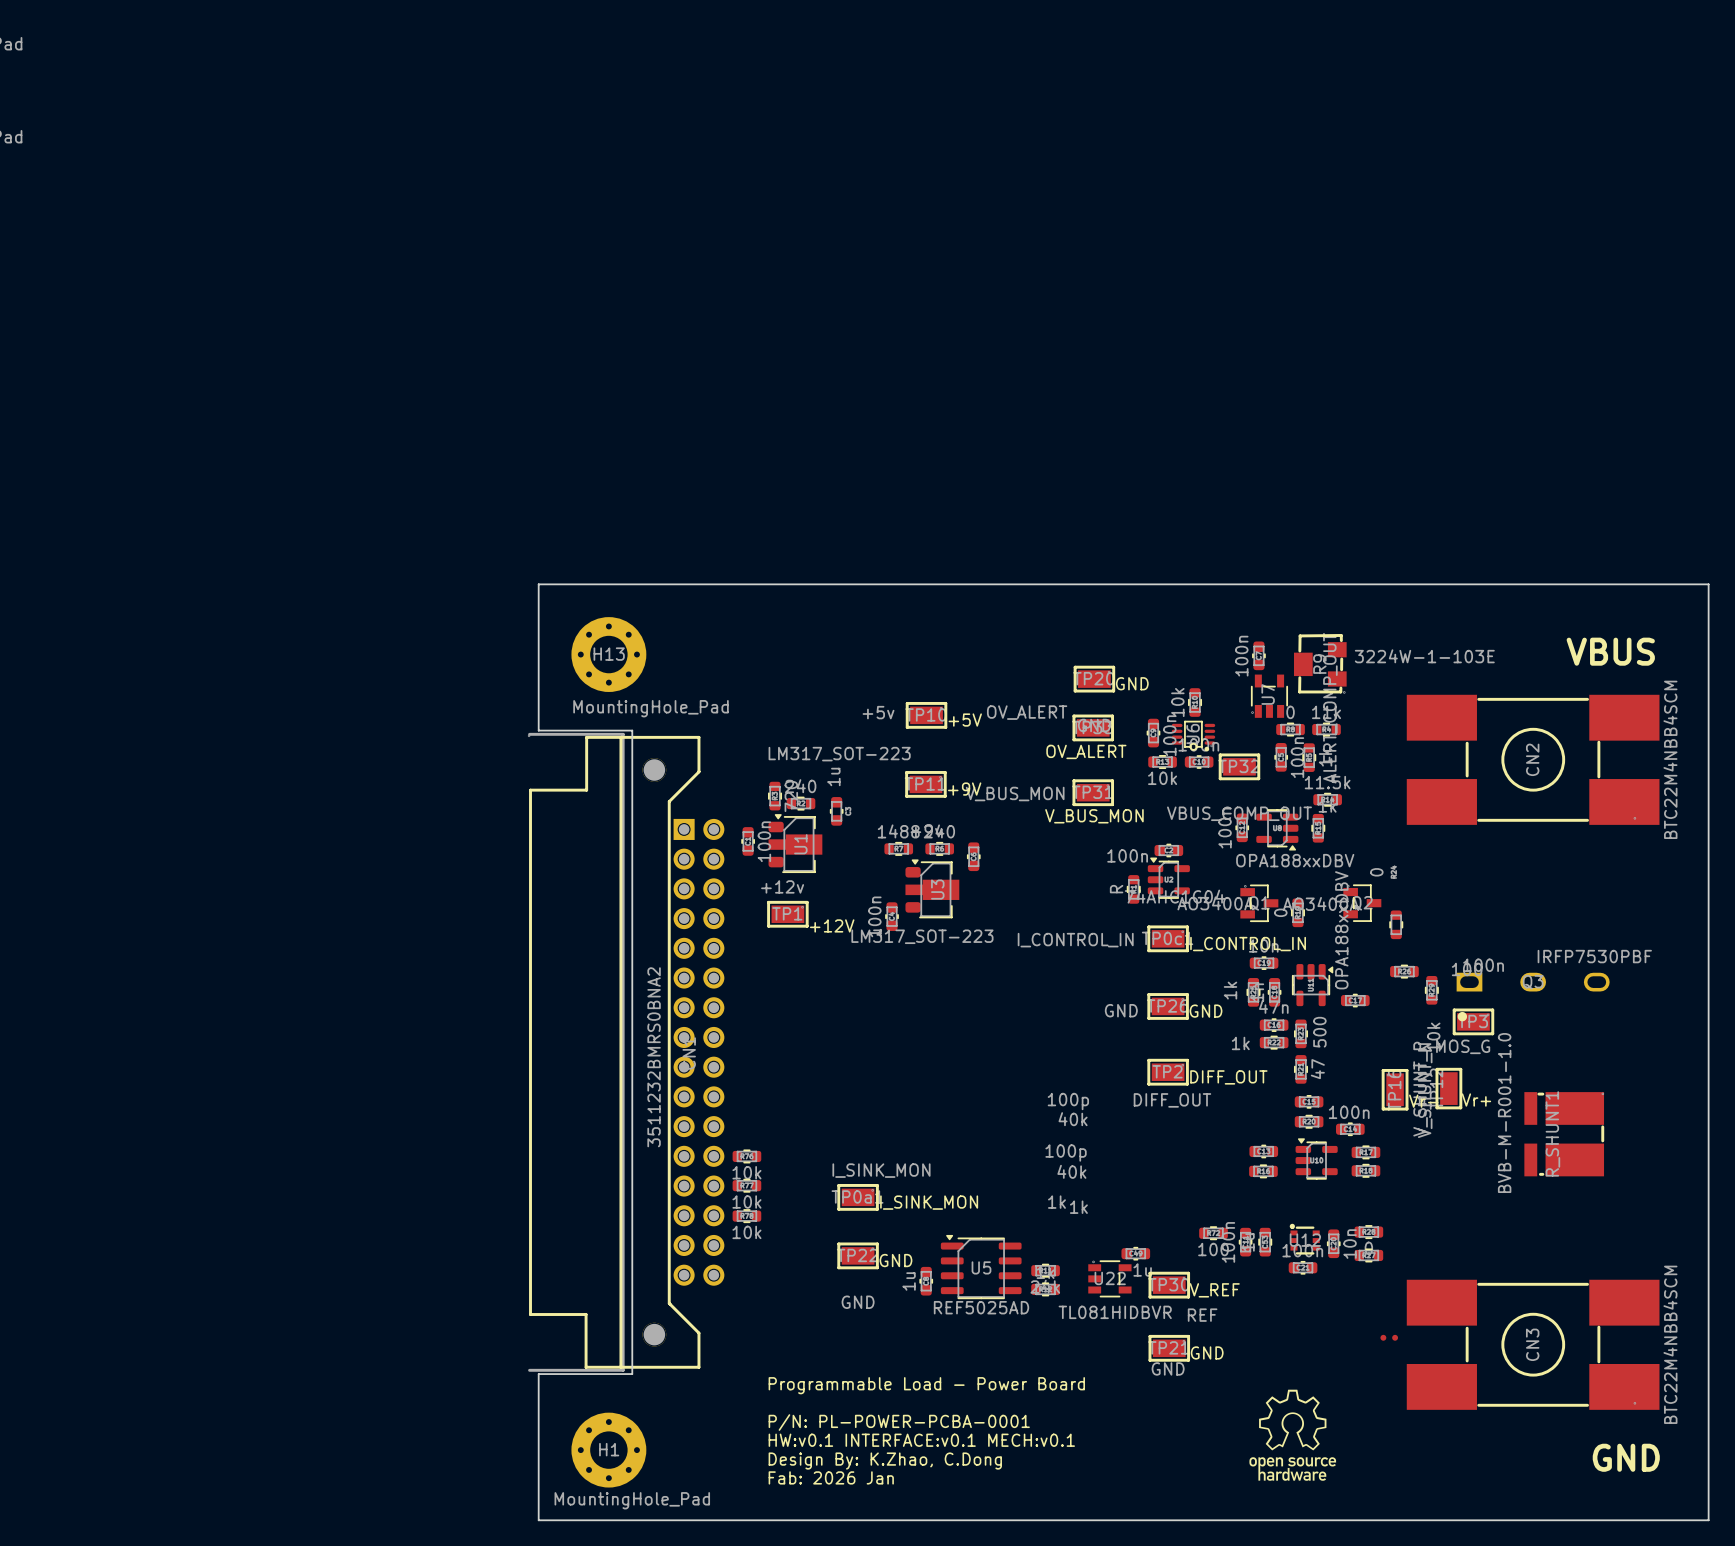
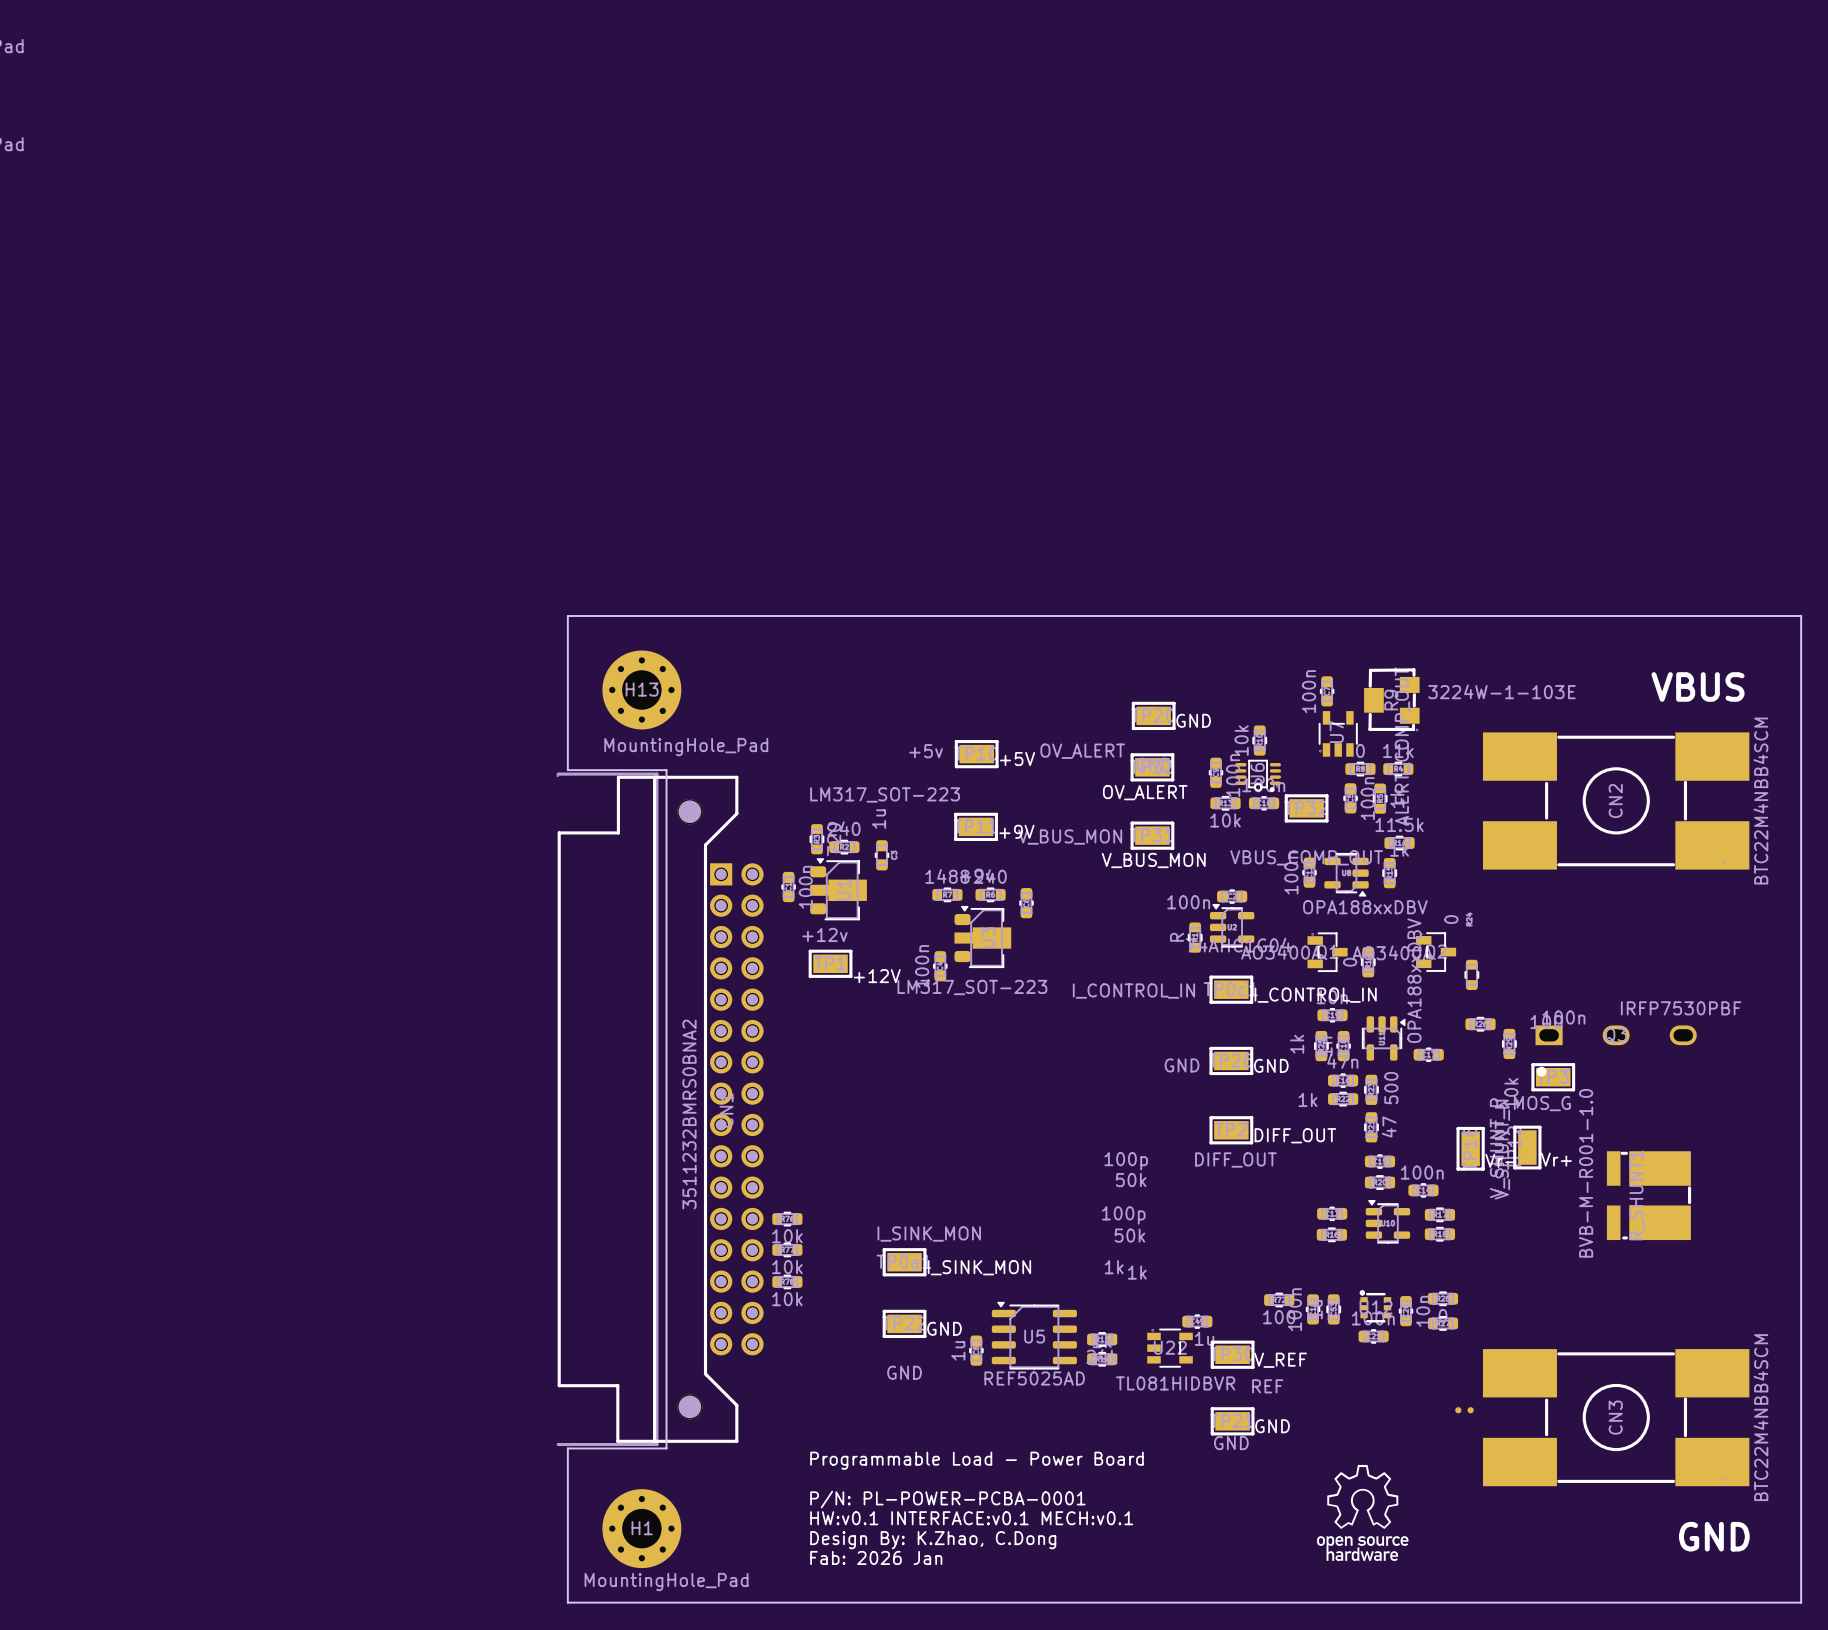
part value: 40k (1073, 1119) -> 50k (1131, 1180)
part value: 40k (1071, 1171) -> 50k (1129, 1235)

